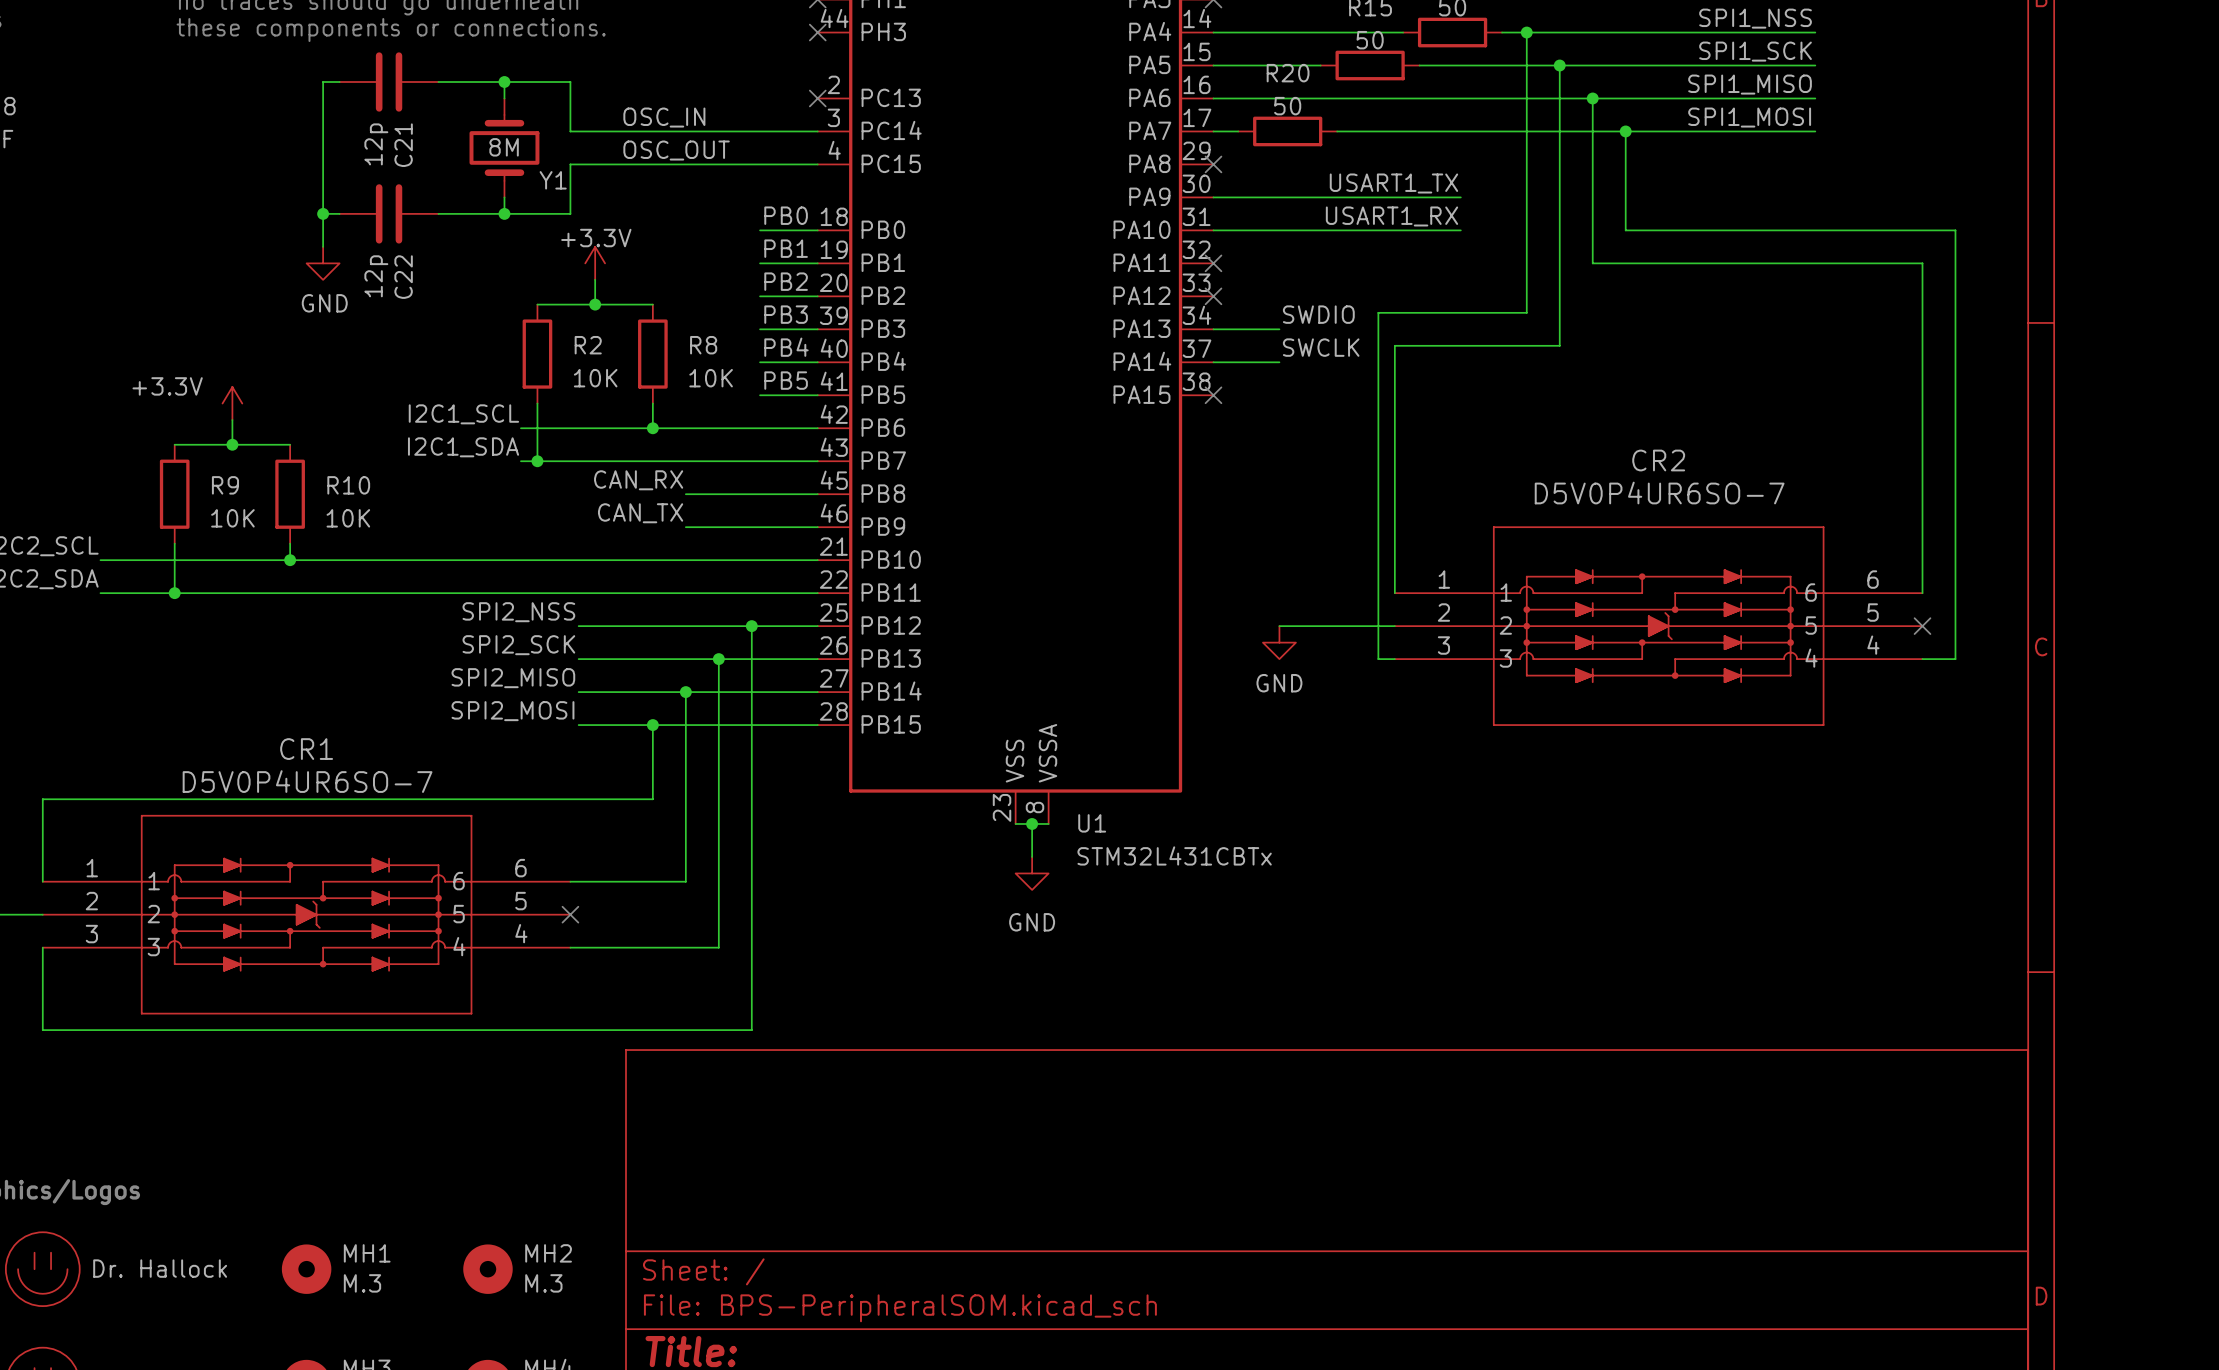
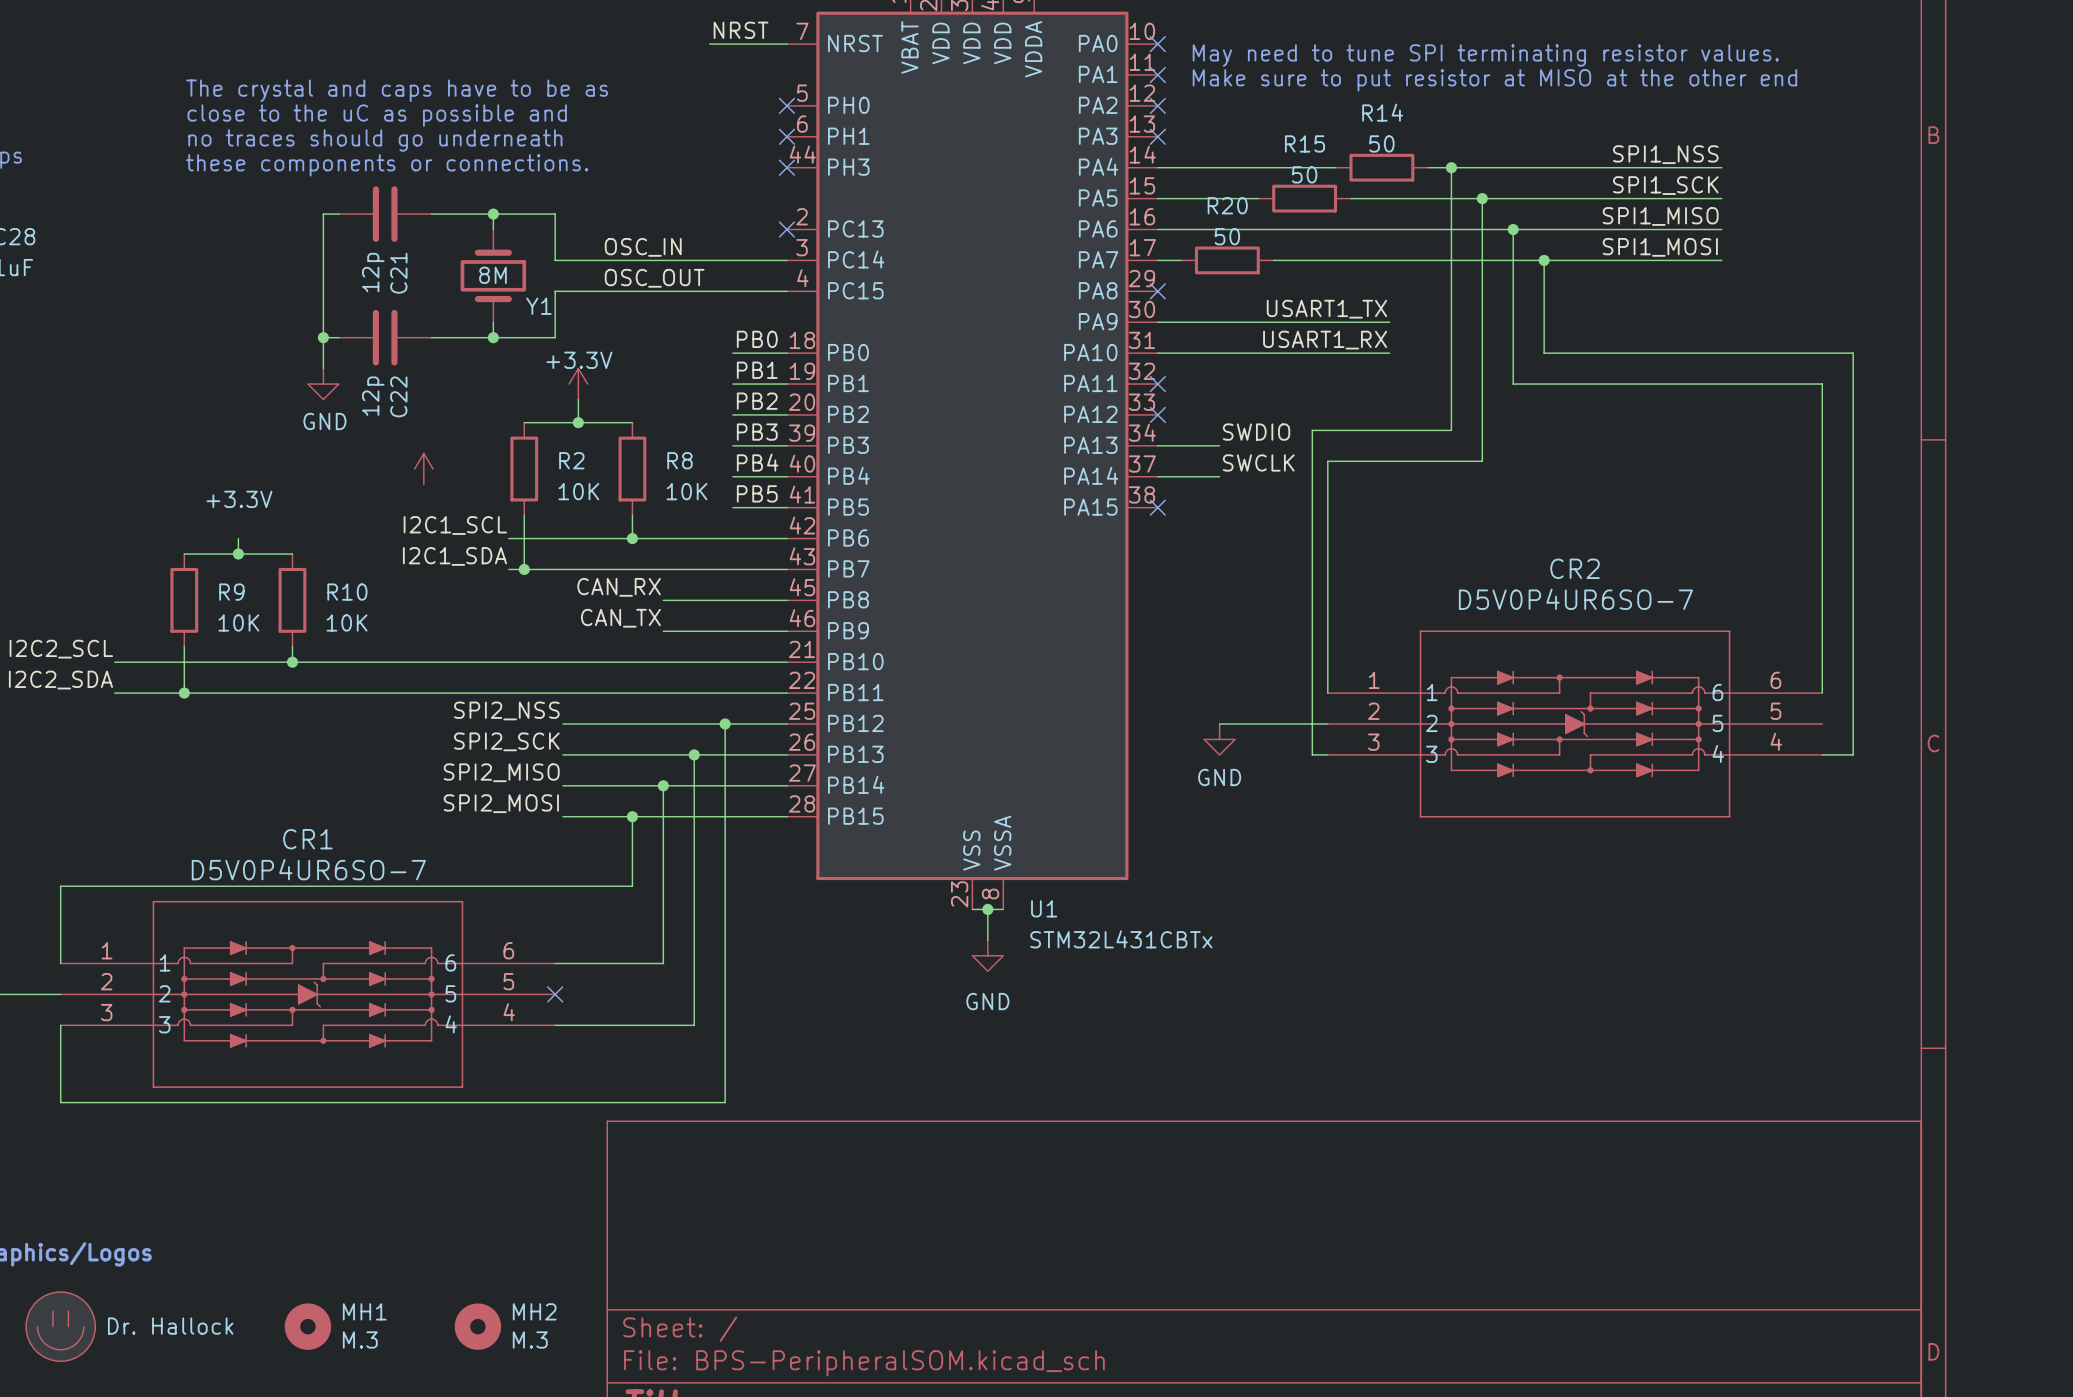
power symbol text position: +3.3V (167, 386) -> +3.3V (239, 499)
power symbol position: +3.3V (232, 403) -> +3.3V (423, 469)
wire: (232, 420) (232, 428) -> none
no-connect mark: (1922, 626) -> none

